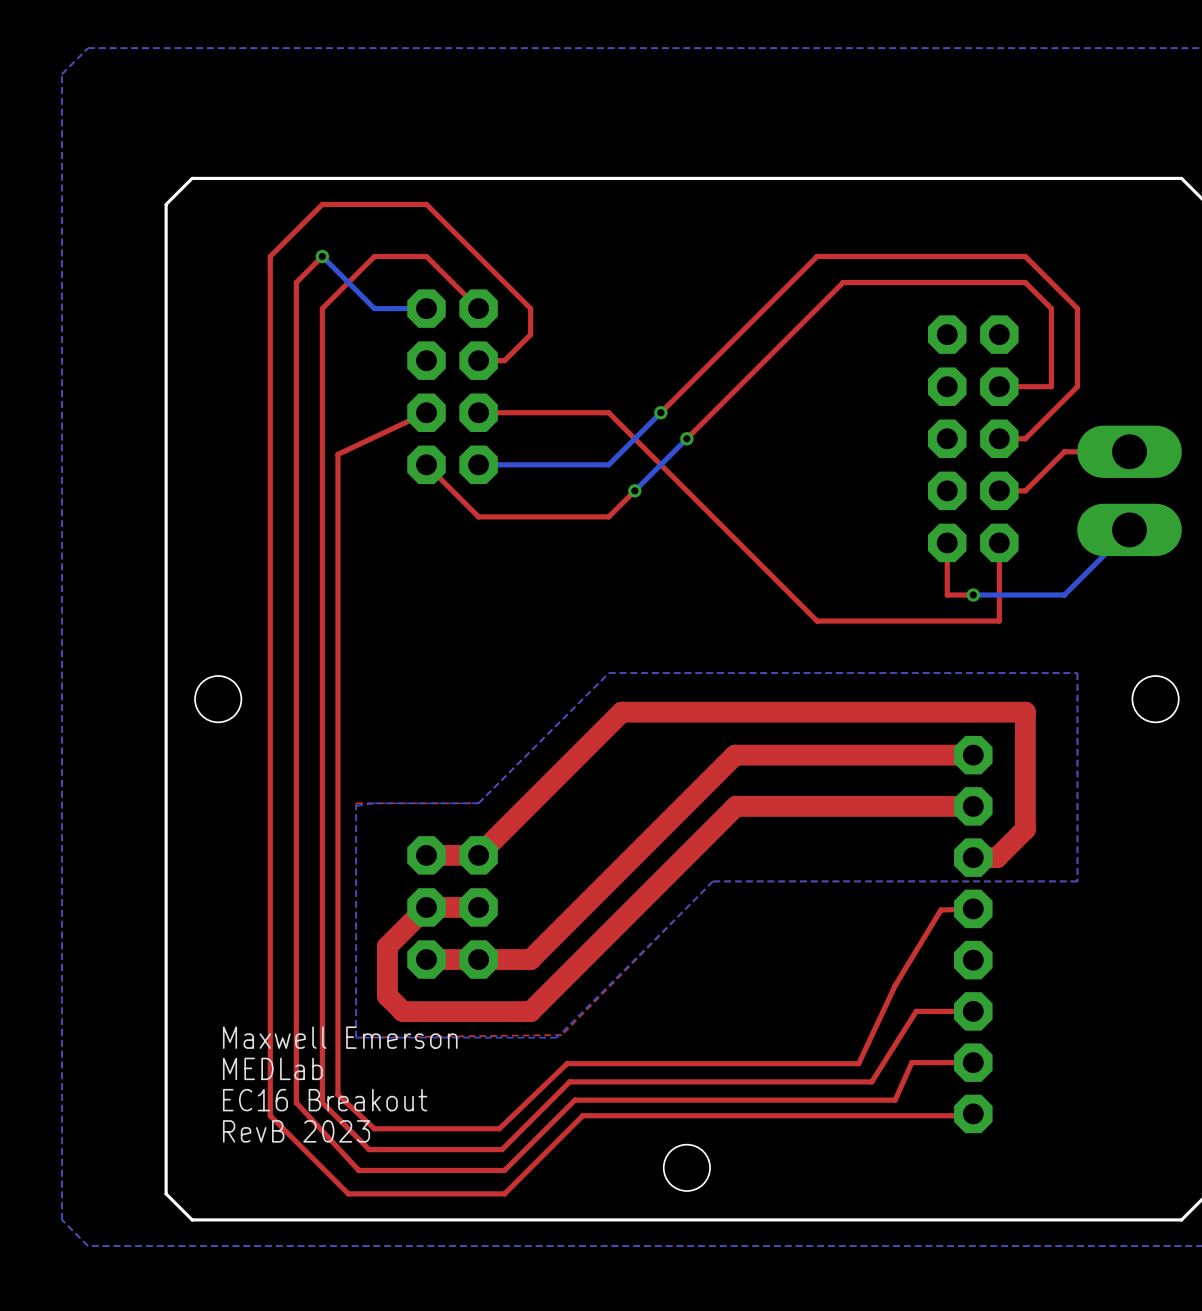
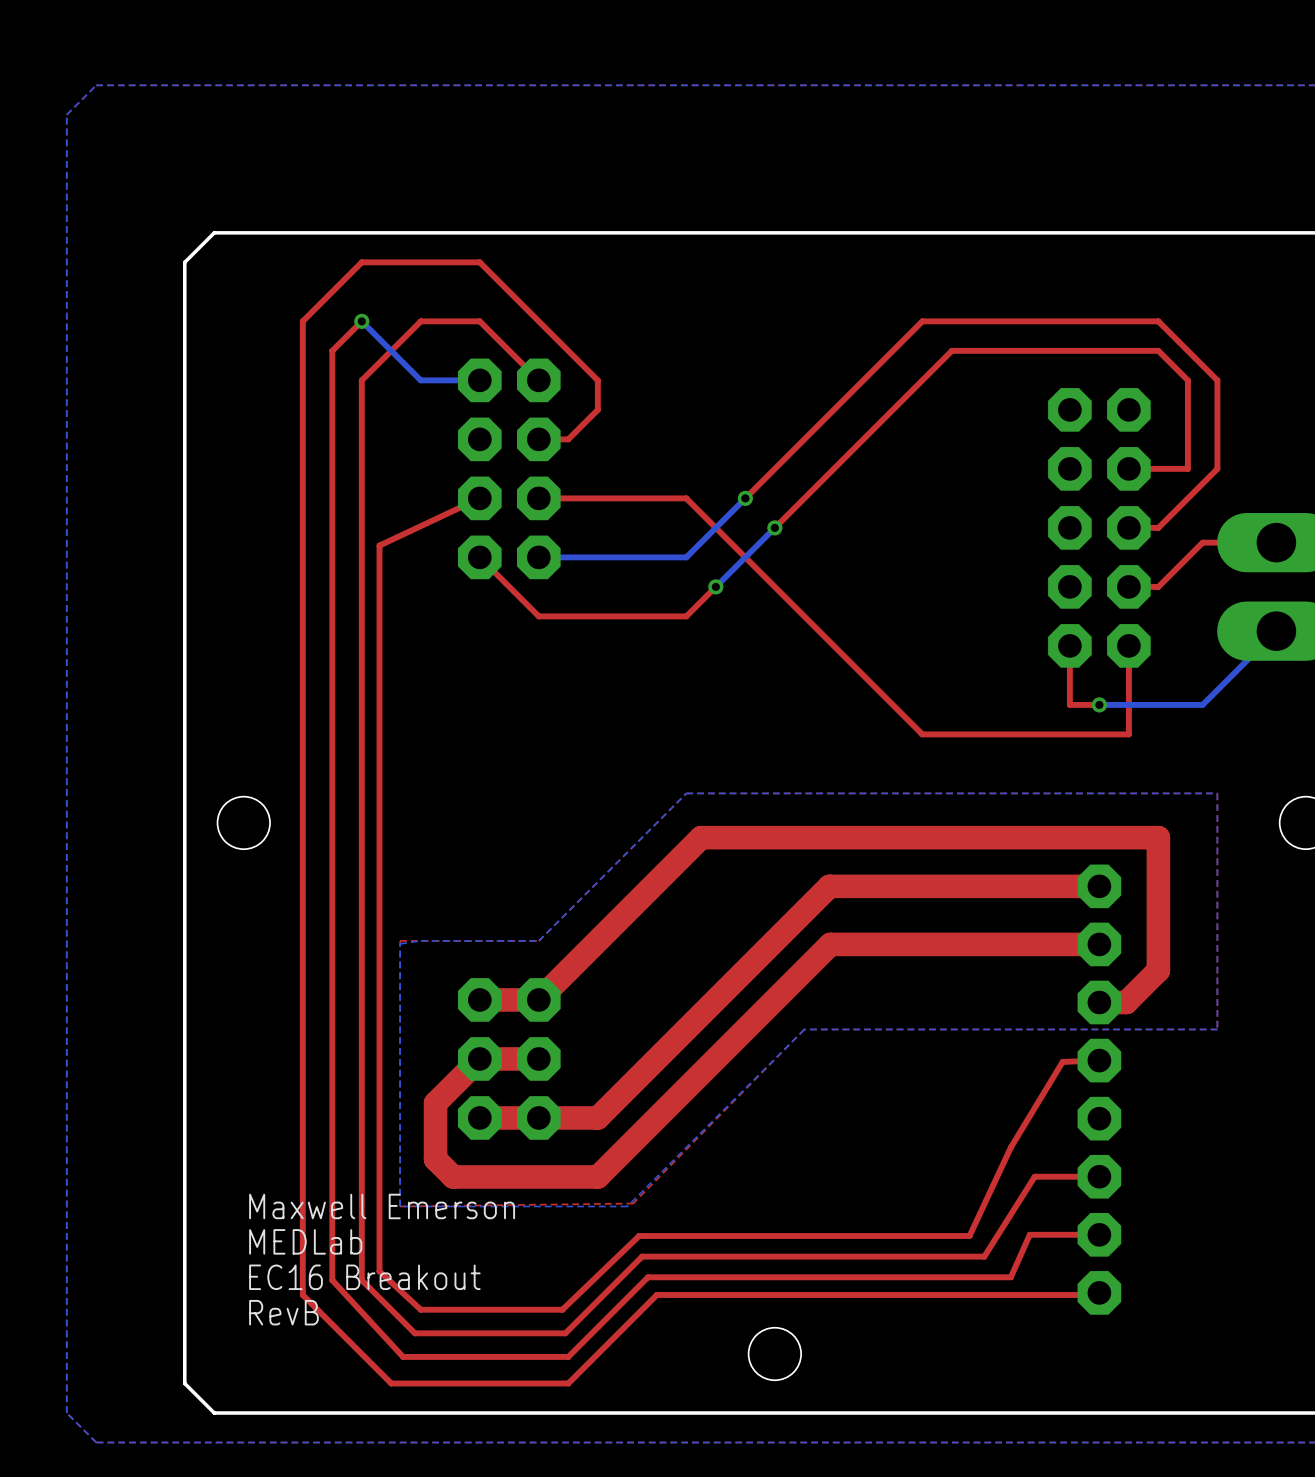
text: RevB 2023 (296, 1131) -> RevB (283, 1312)

